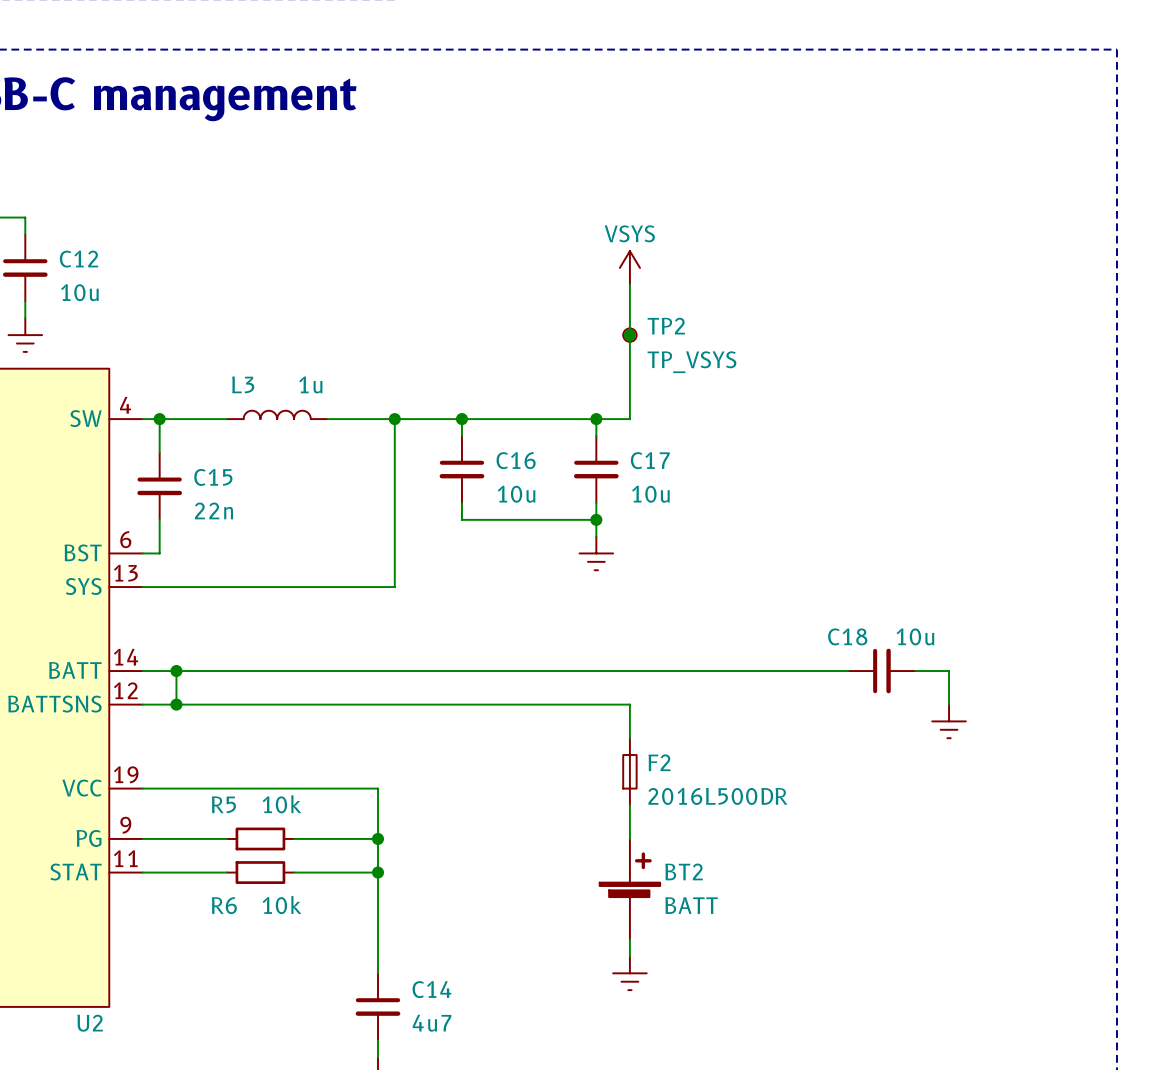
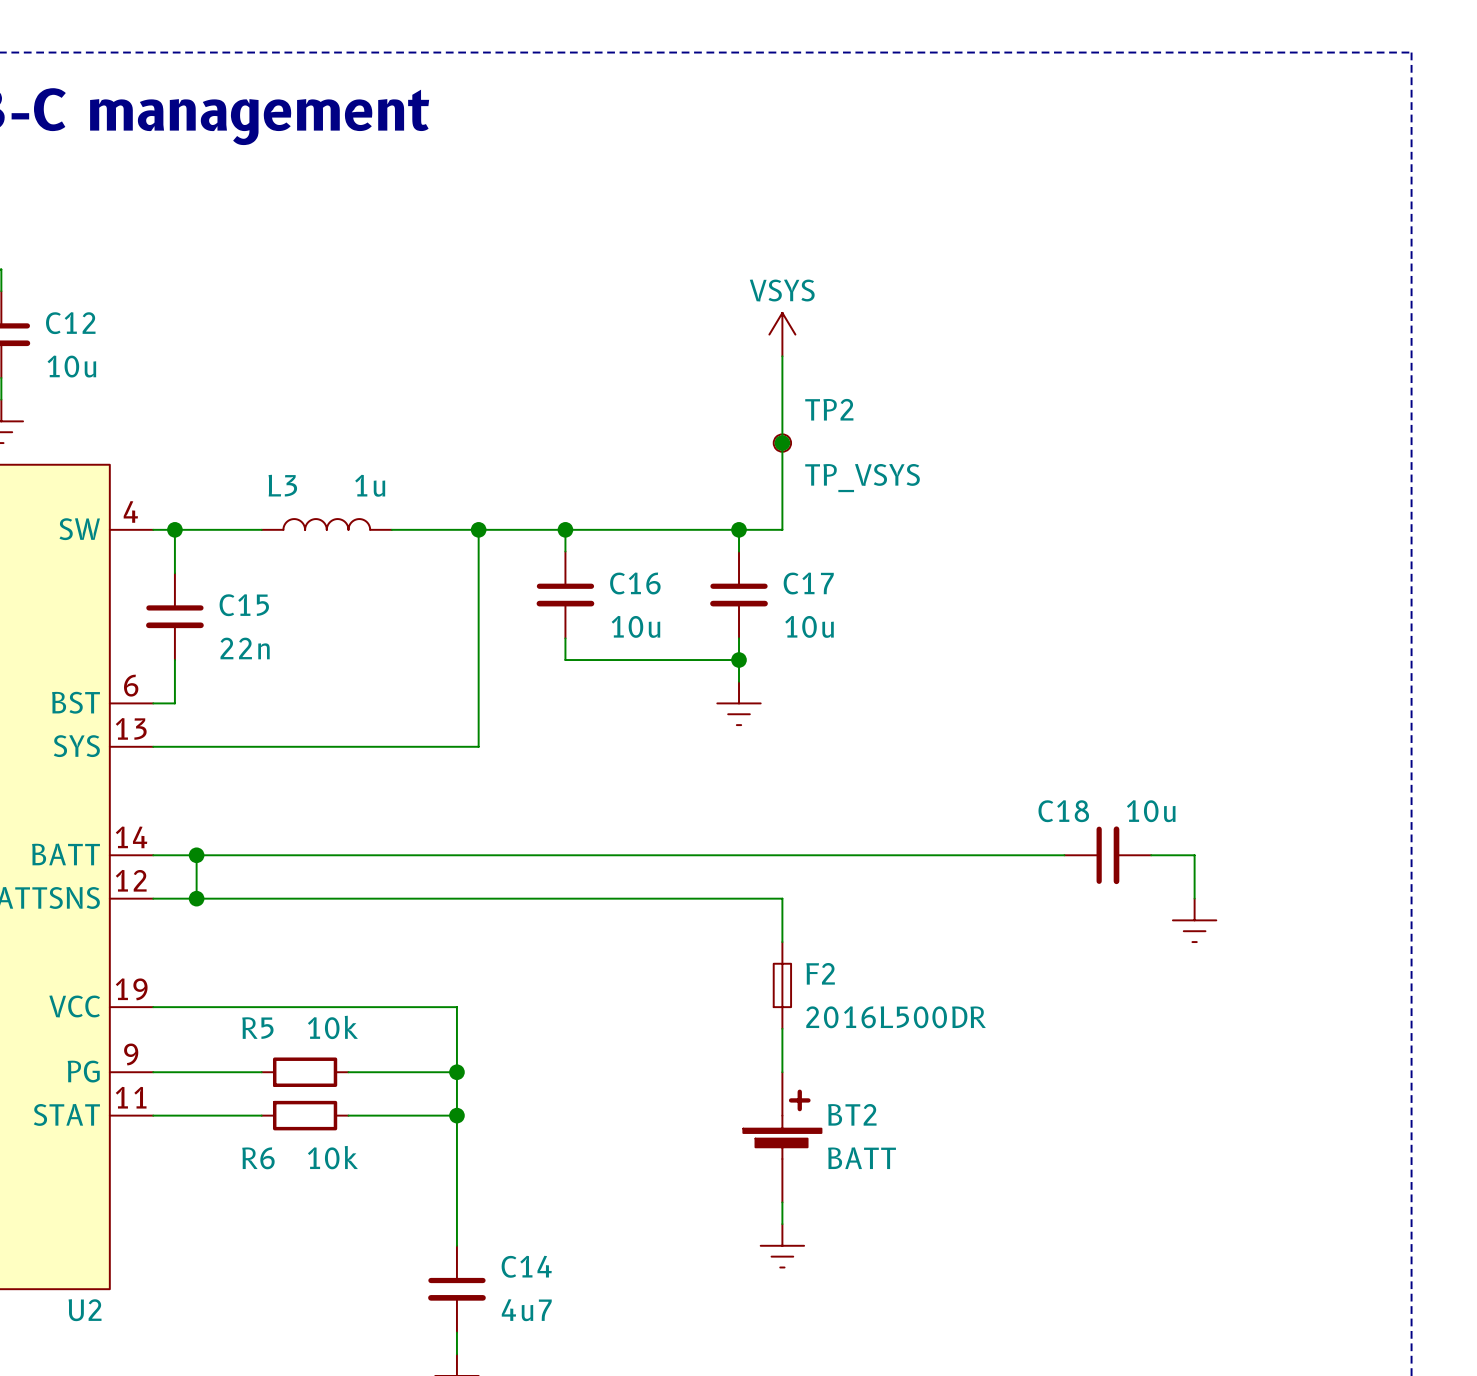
junction position: (629, 335) -> (782, 443)
TP2 position: (629, 335) -> (782, 443)

